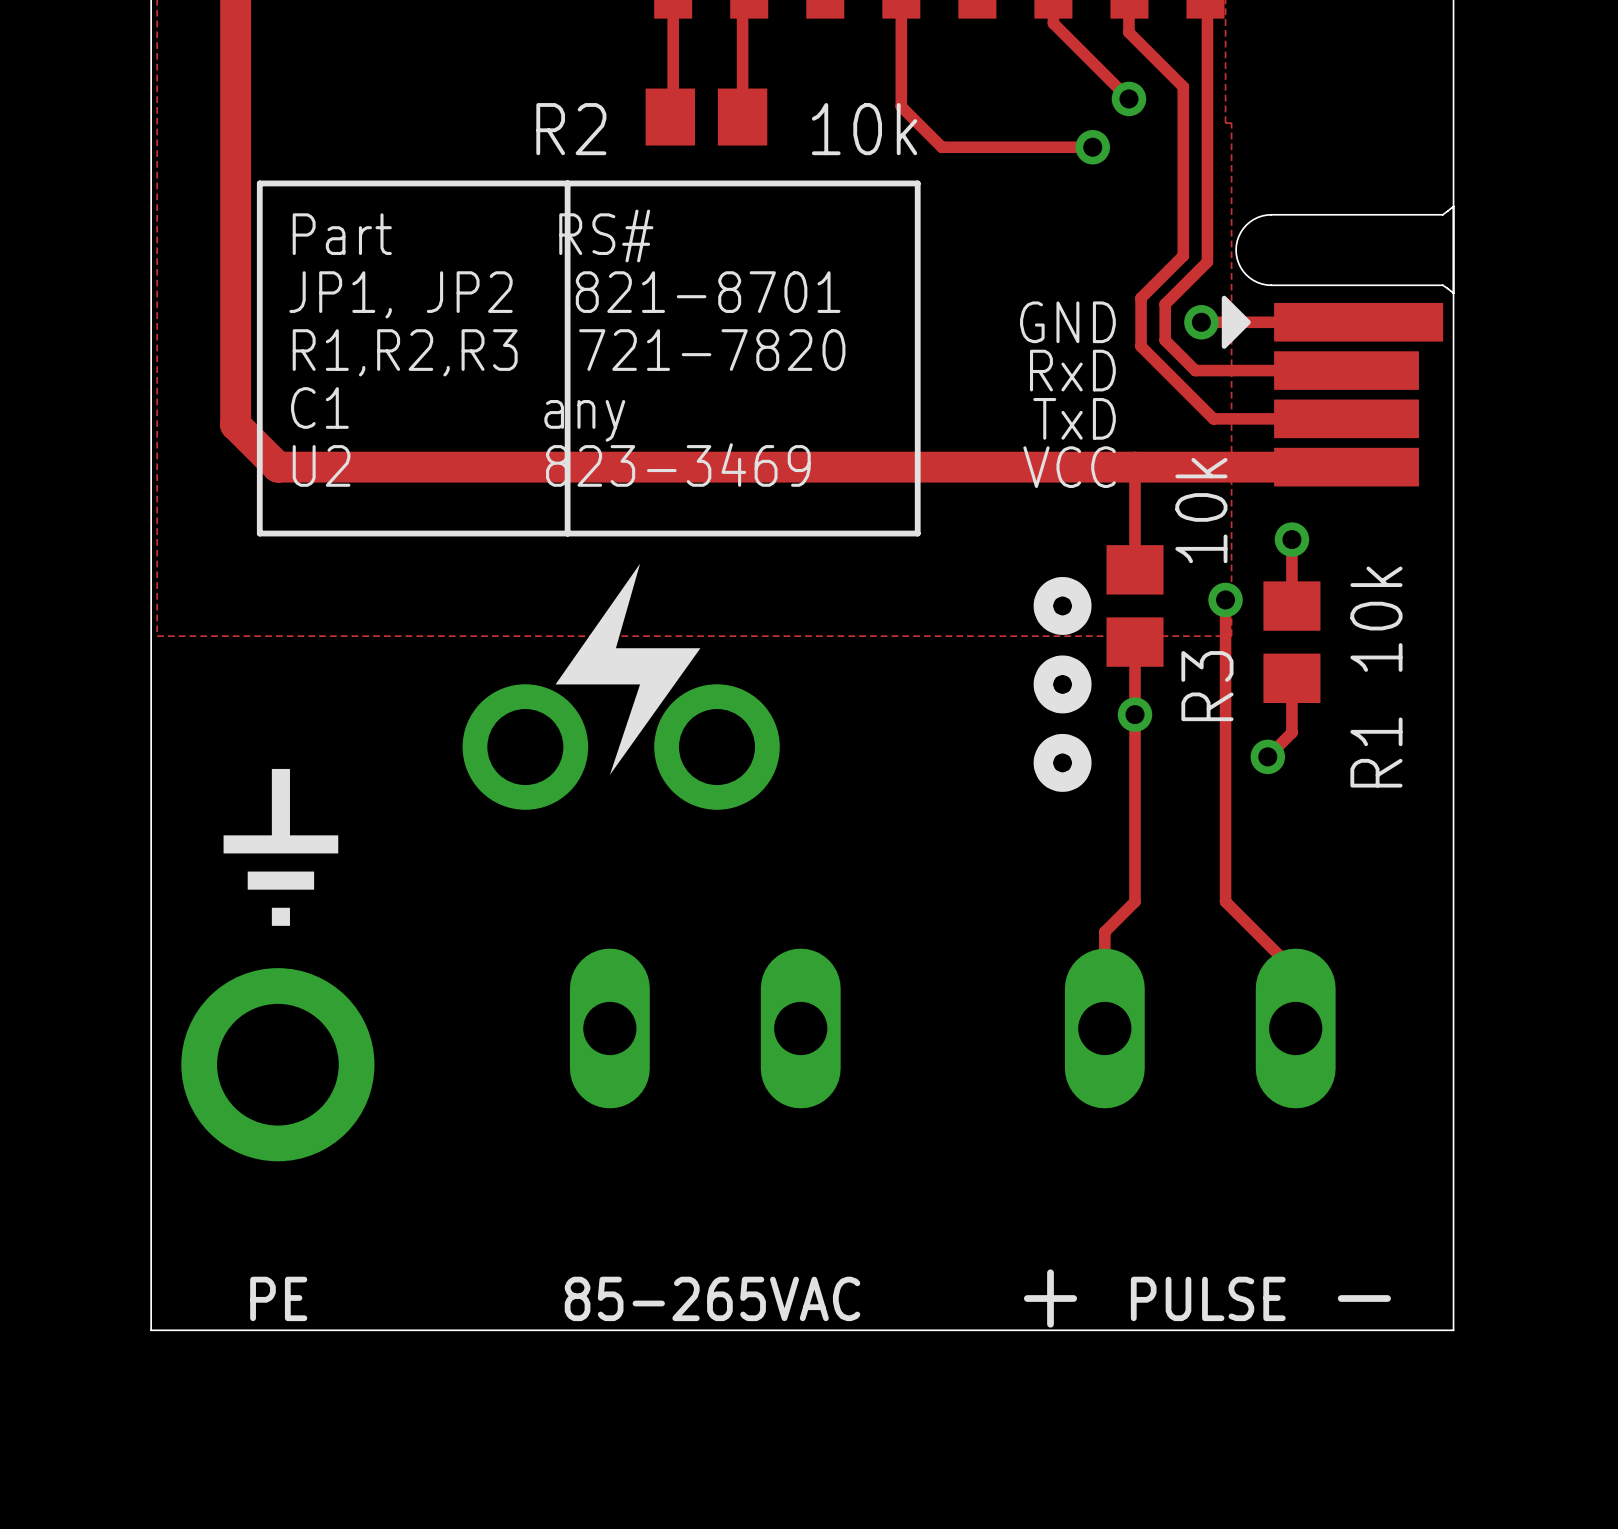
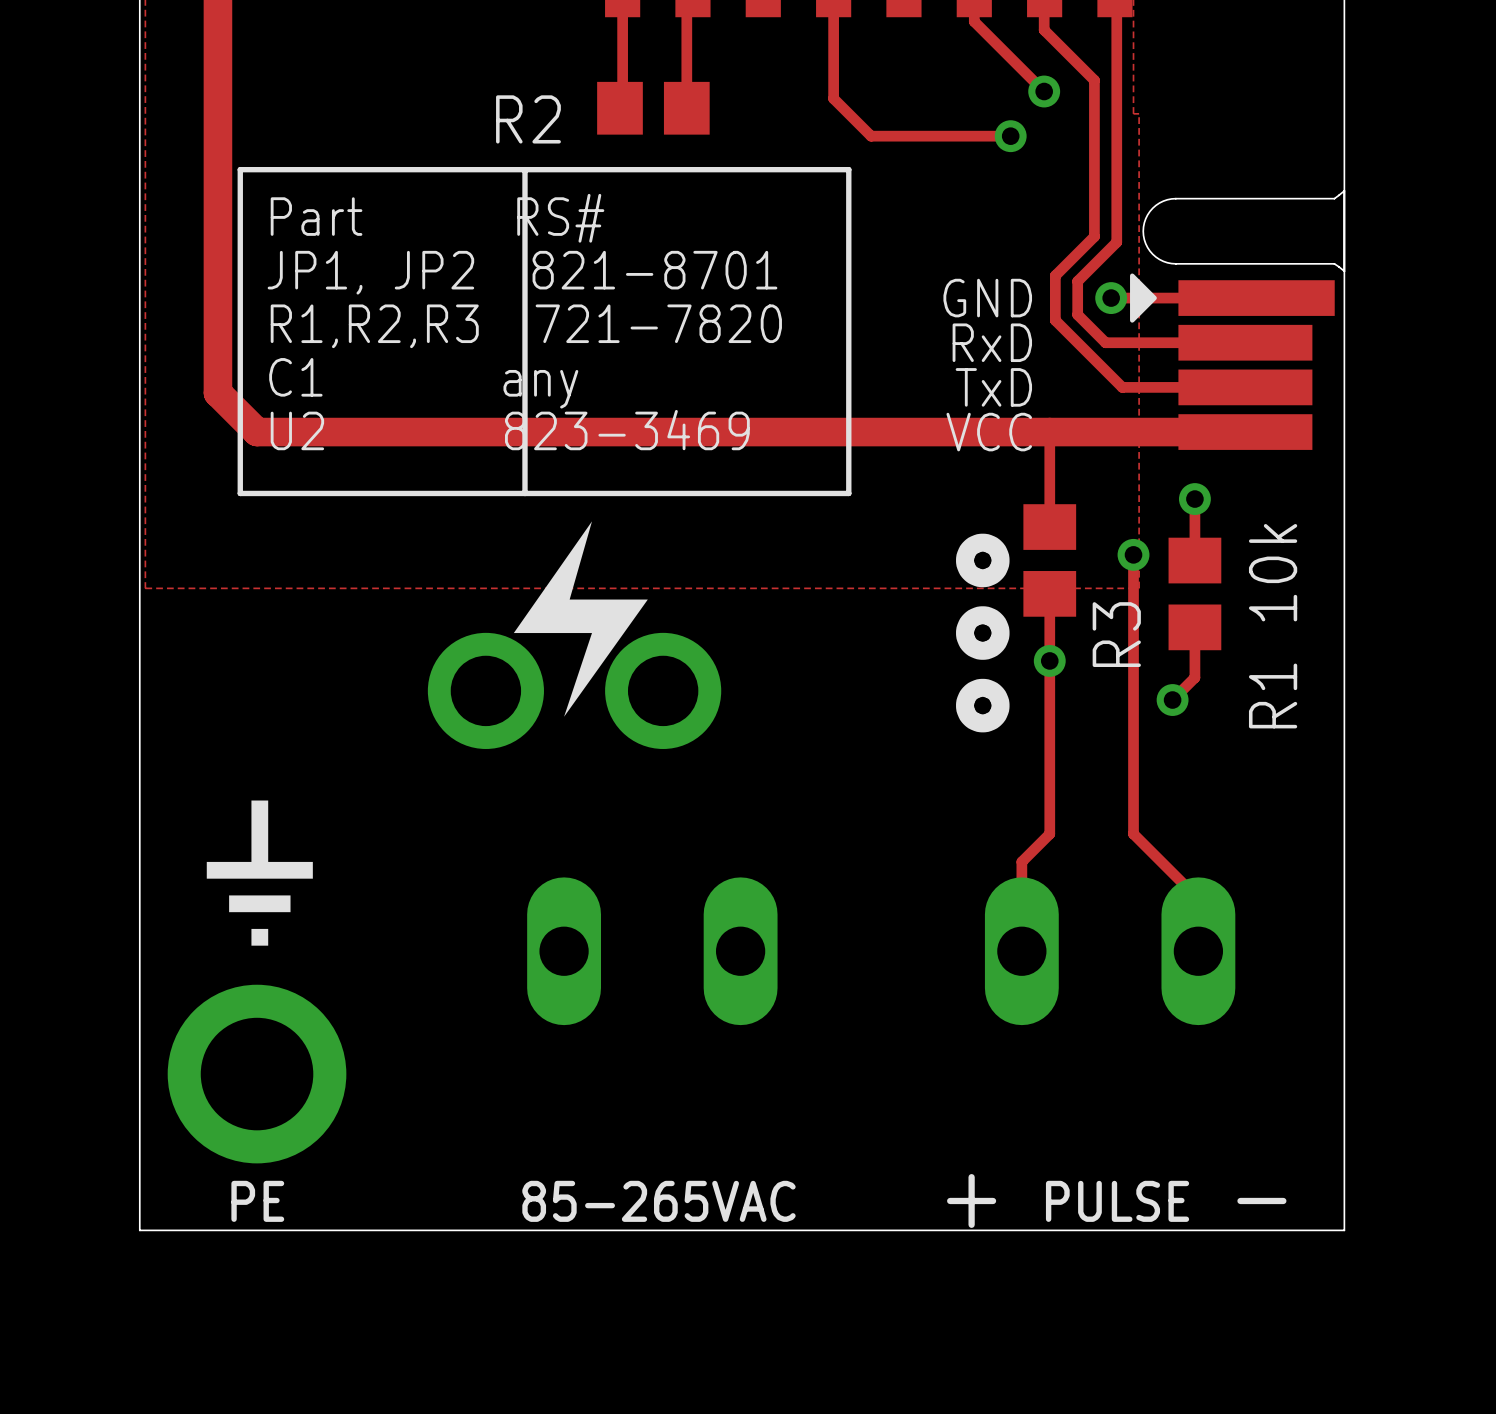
R2 value: 10k (864, 129) -> none
R3 value: 10k (1201, 510) -> none
drawing position: (280, 802) -> (259, 831)
drawing position: (280, 844) -> (259, 870)
drawing position: (280, 880) -> (259, 903)
drawing position: (280, 916) -> (259, 937)
via position: (277, 1064) -> (257, 1074)

